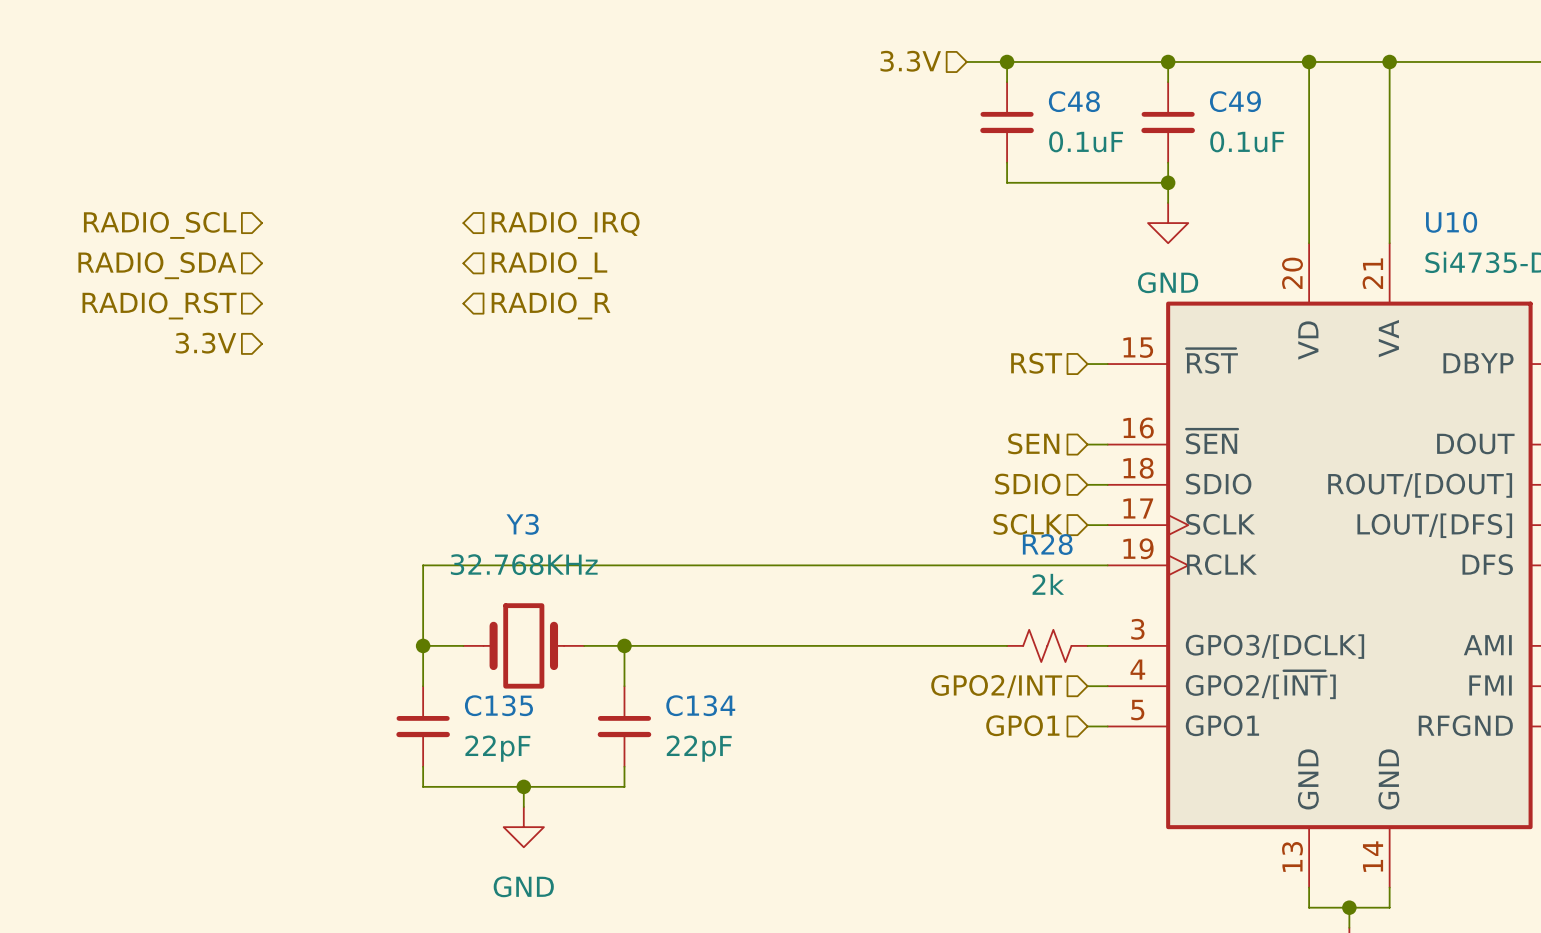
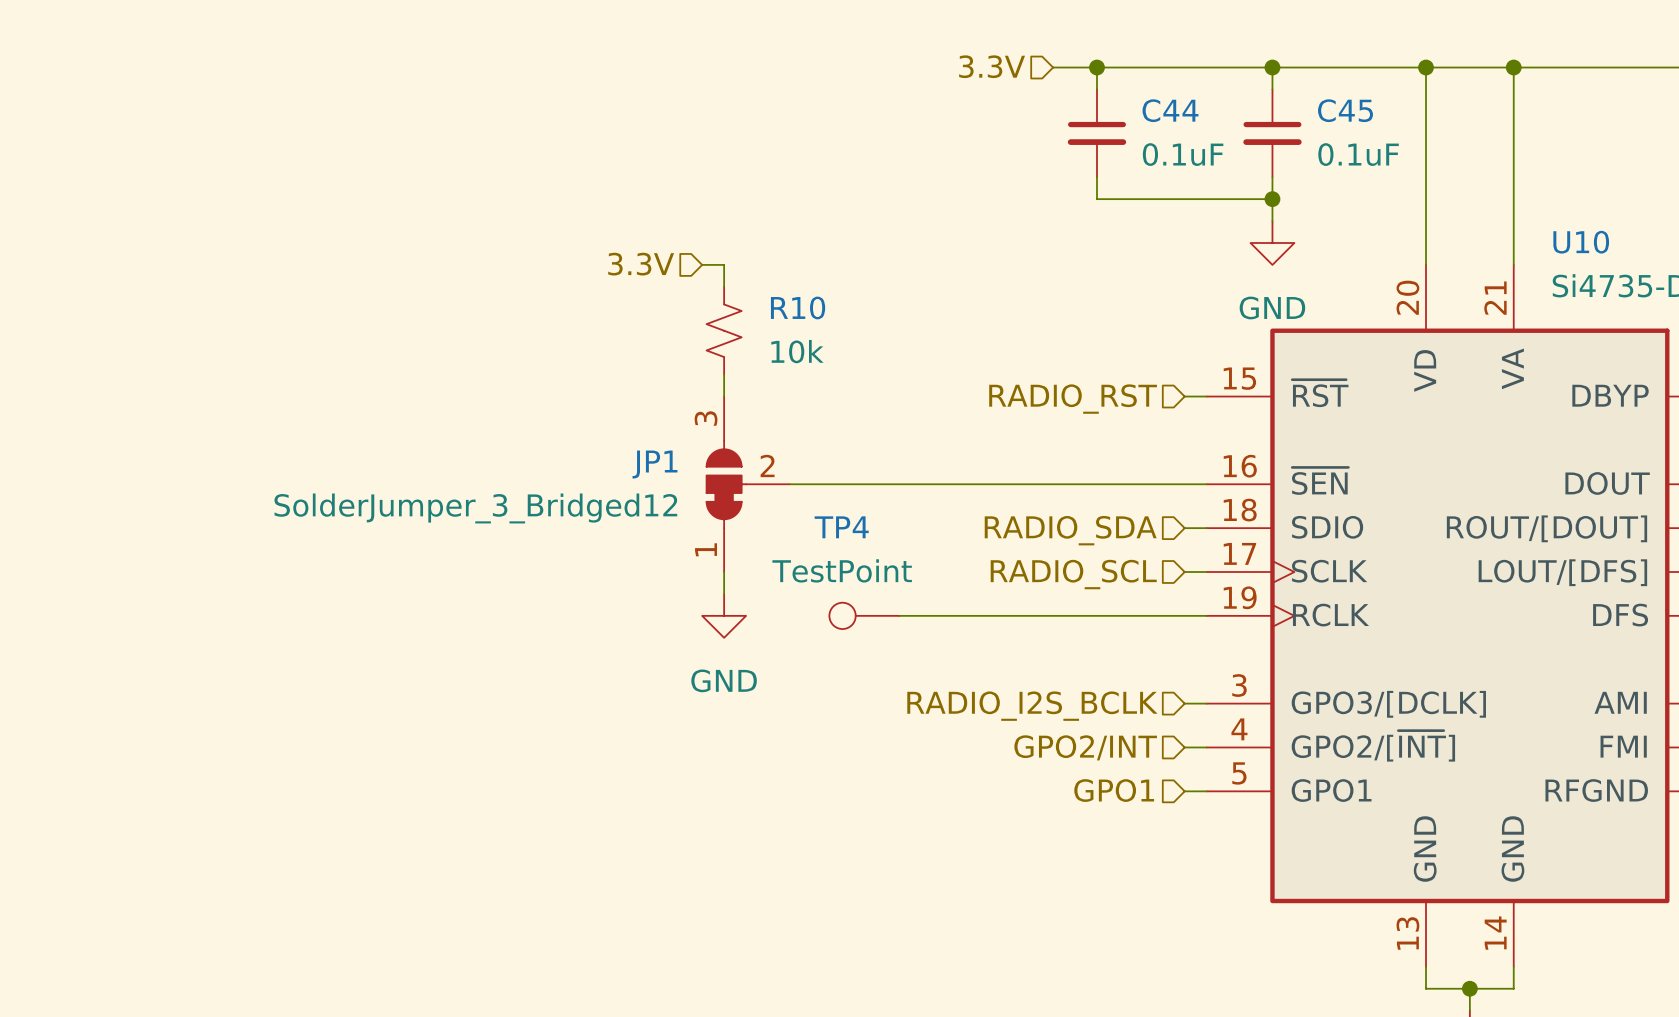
C48 name: C48 (1074, 101) -> C44 (1170, 110)
C49 name: C49 (1235, 101) -> C45 (1345, 110)
hierarchical label: RADIO_SCL (160, 225) -> none
hierarchical label: RADIO_IRQ (565, 225) -> none
wire: none -> (702, 264) (724, 264) (724, 286)
hierarchical label: RADIO_SDA (157, 265) -> none
hierarchical label: RADIO_L (549, 265) -> none
R10: none -> 10k (724, 330)
hierarchical label: RADIO_RST (159, 305) -> none
hierarchical label: RADIO_R (551, 305) -> none
hierarchical label position: 3.3V (205, 343) -> 3.3V (641, 264)
wire: none -> (724, 374) (724, 396)
hierarchical label: RST (1036, 363) -> RADIO_RST (1073, 399)
hierarchical label: SEN (1033, 443) -> none
JP1: none -> SolderJumper_3_Bridged12 (748, 484)
wire: none -> (789, 484) (1184, 484)
hierarchical label: SDIO (1027, 484) -> RADIO_SDA (1070, 530)
hierarchical label: SCLK (1028, 524) -> RADIO_SCL (1073, 574)
TP4: none -> TestPoint (864, 615)
wire: (825, 565) (423, 565) (423, 686) -> none
wire: (423, 645) (463, 645) -> none
junction: (423, 645) -> none
Y3: 32.768KHz (523, 645) -> none
wire: (584, 645) (1007, 645) -> none
wire: (624, 645) (624, 686) -> none
junction: (624, 645) -> none
R28: 2k (1047, 645) -> none
hierarchical label: none -> RADIO_I2S_BCLK (1032, 706)
C135: 22pF (423, 726) -> none
C134: 22pF (624, 726) -> none
wire: (423, 766) (423, 786) (624, 786) (624, 766) -> none
wire: (523, 786) (523, 807) -> (724, 572) (724, 593)
junction: (523, 786) -> none
power symbol position: GND (523, 827) -> GND (724, 615)

